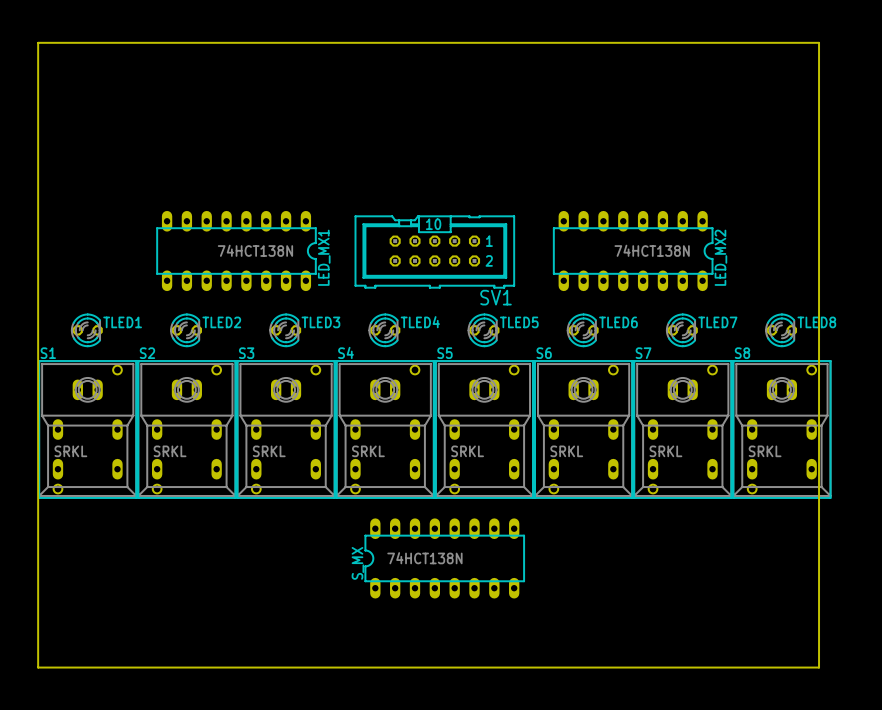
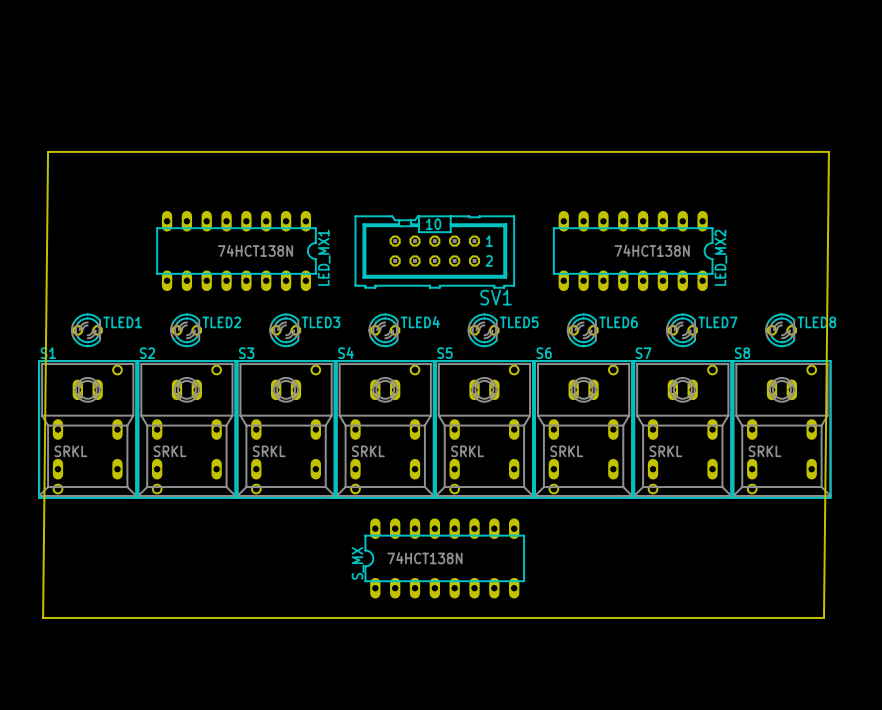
board edge: (38, 42) (819, 42) (819, 667) (38, 667) (38, 42) -> (48, 151) (43, 617) (823, 617) (828, 151) (48, 151)

